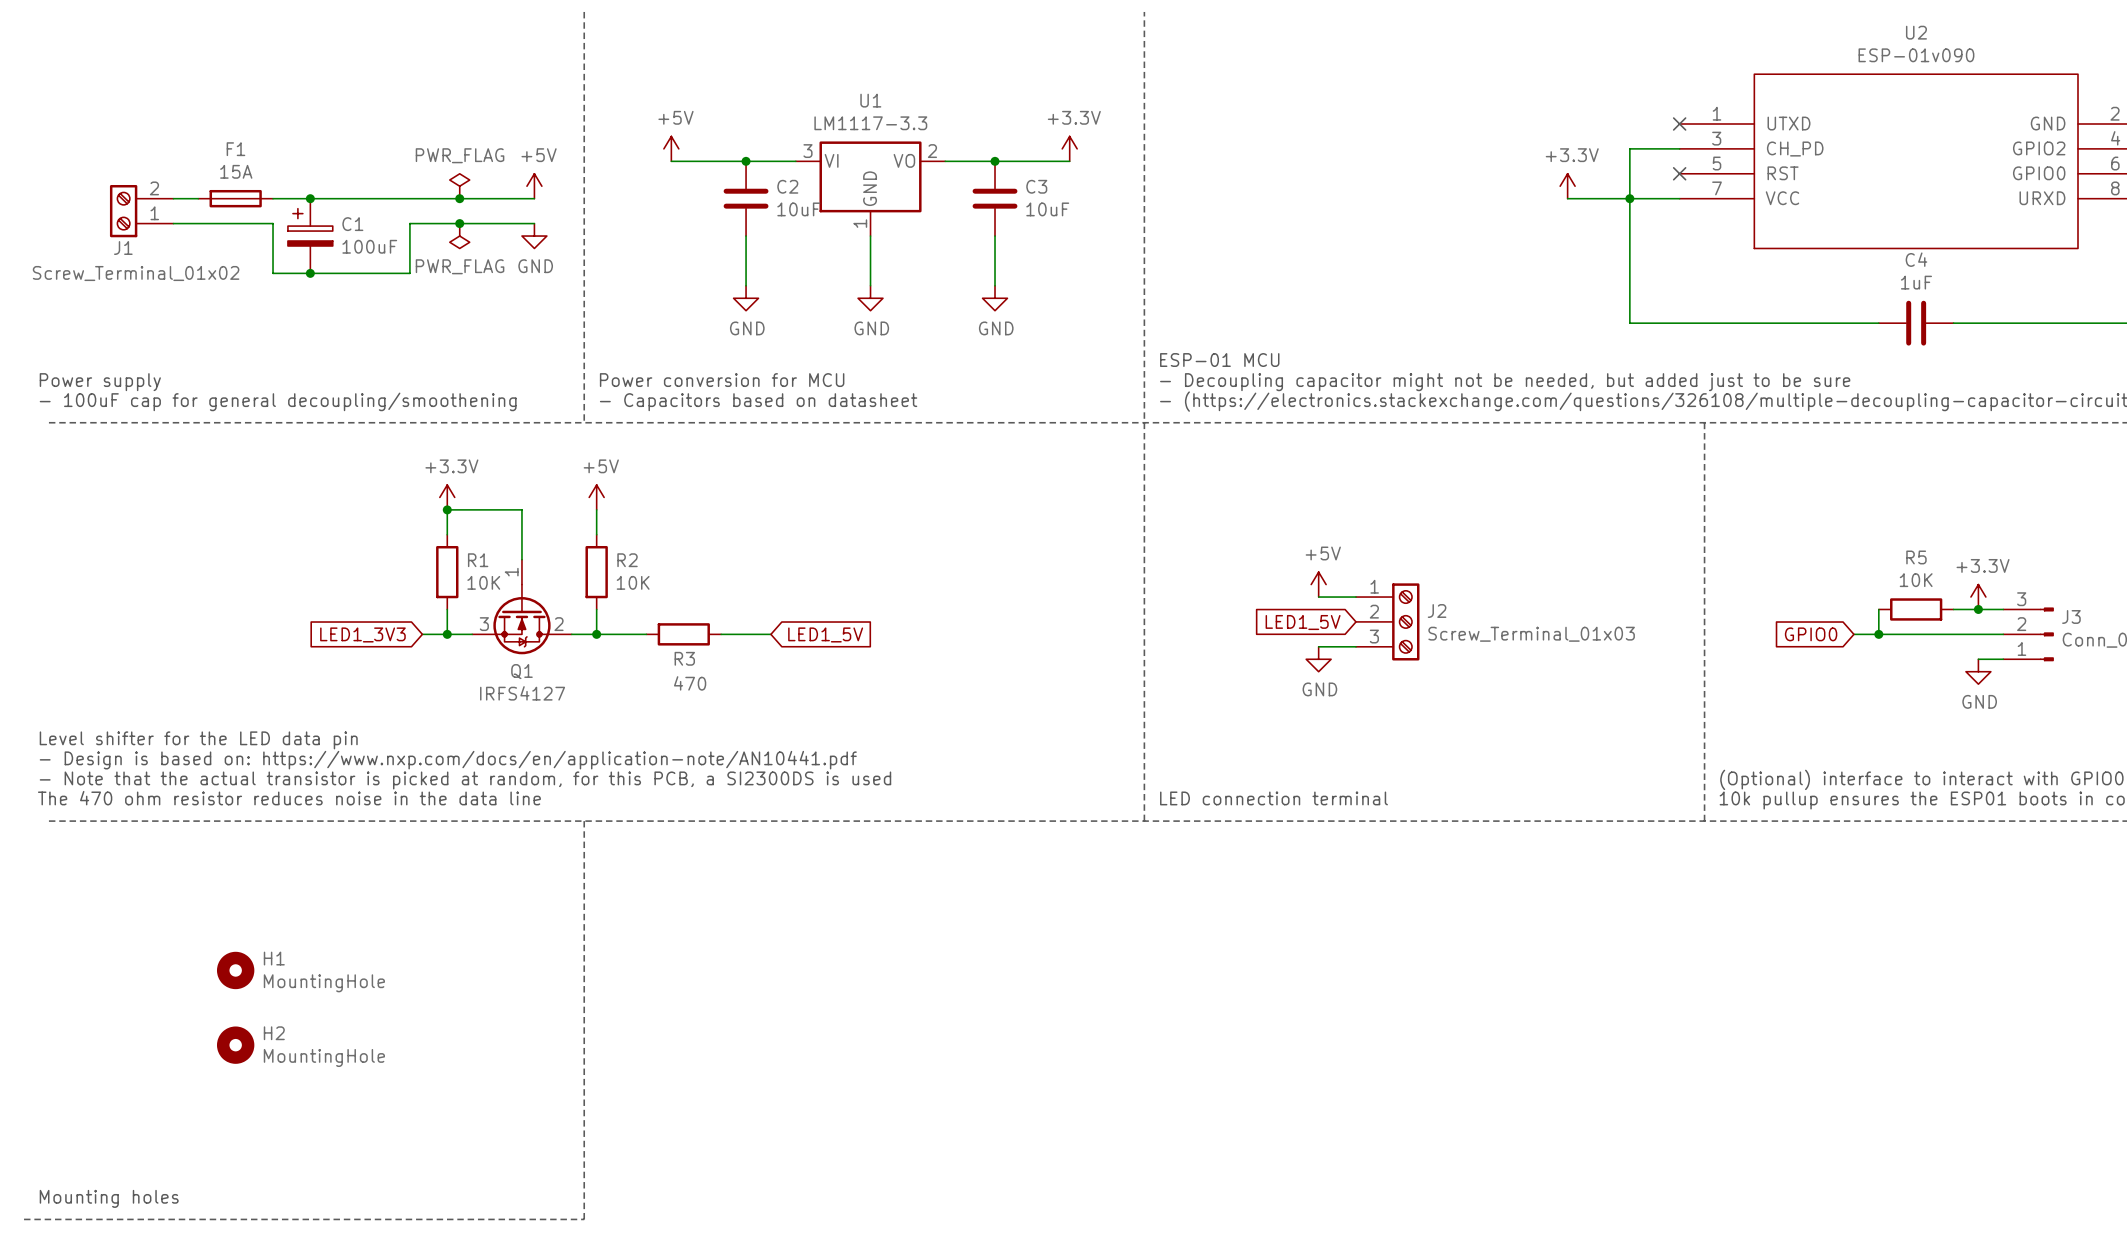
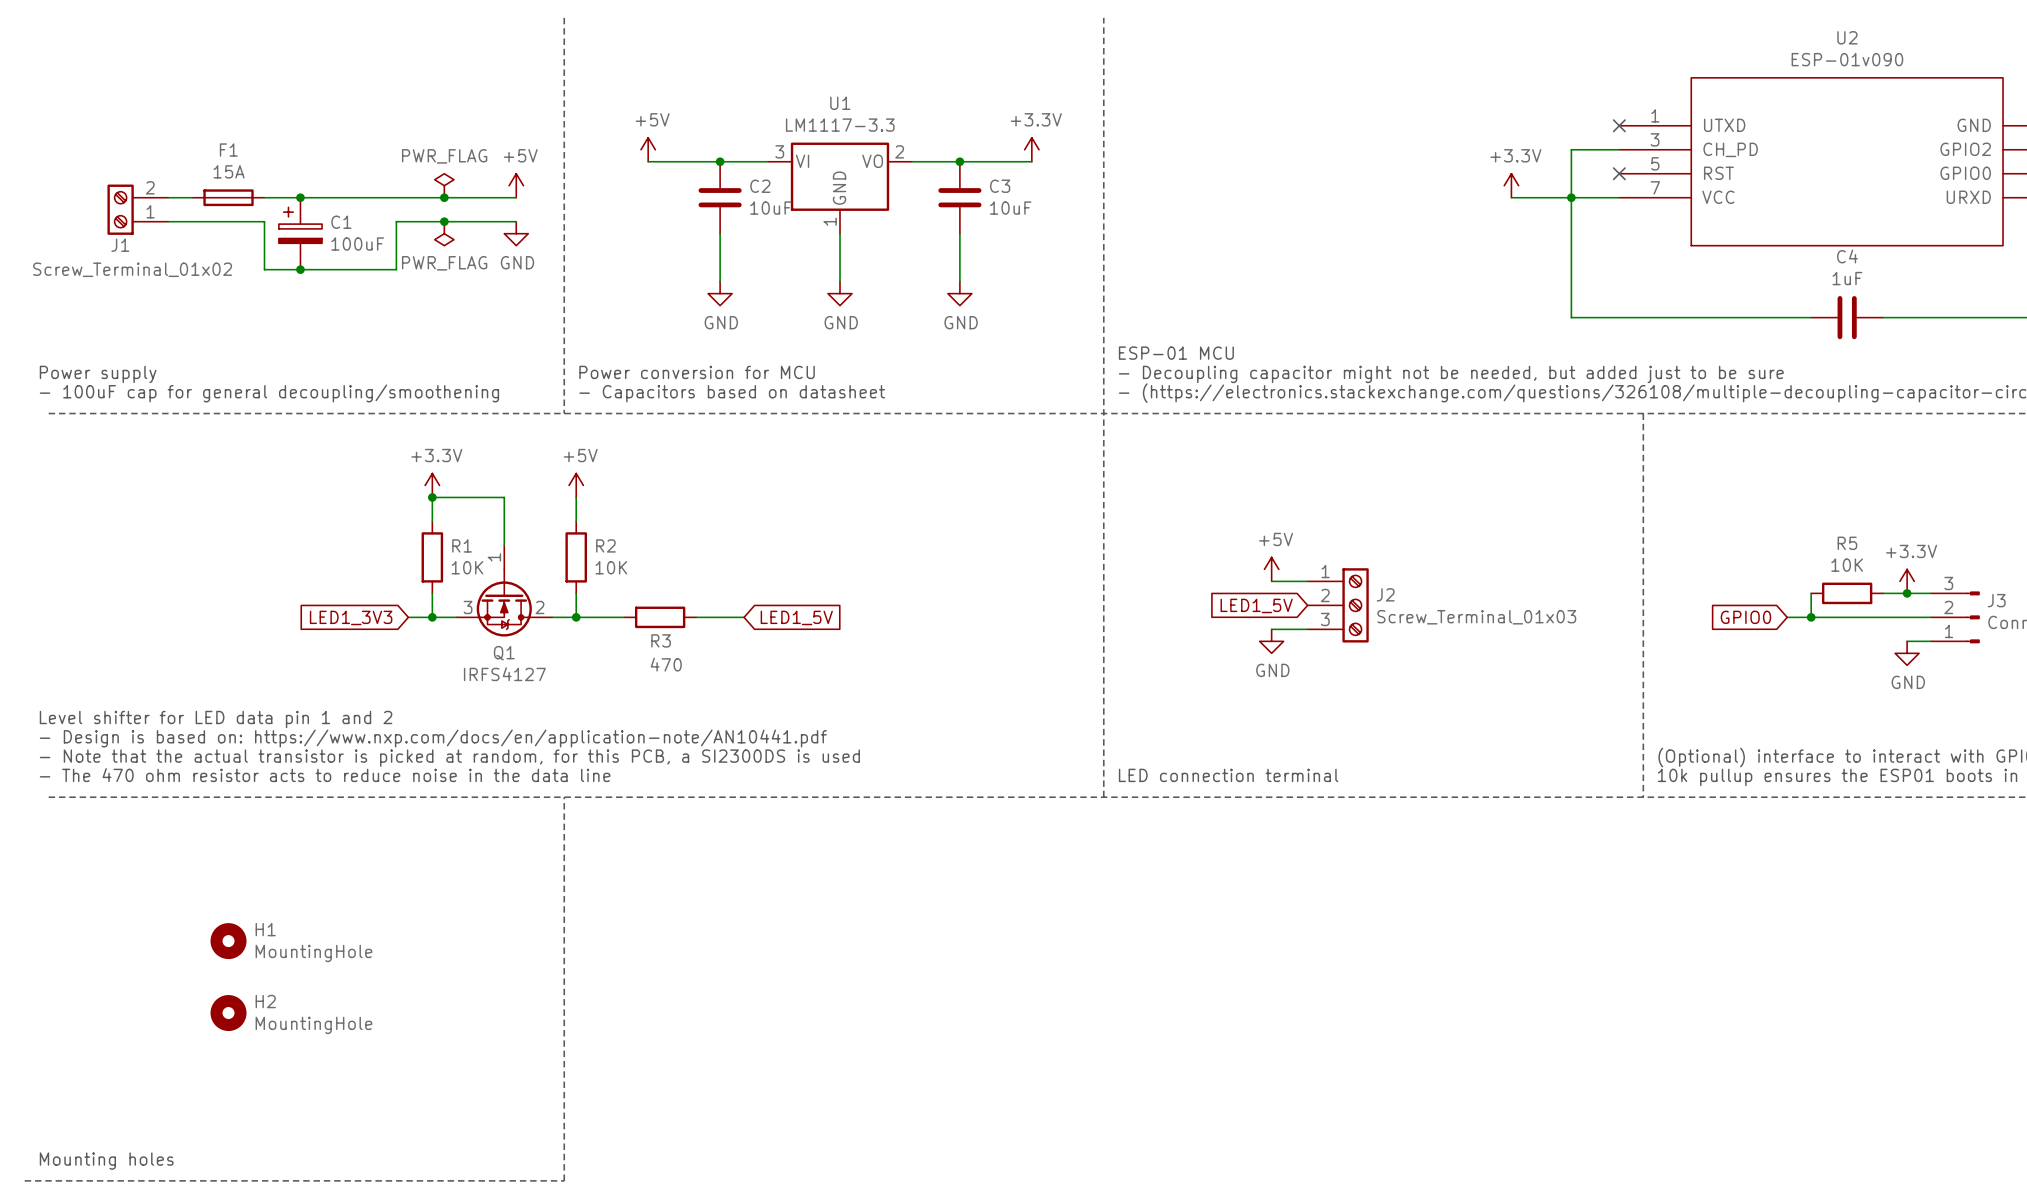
text: Level shifter for the LED data pin (198, 740) -> Level shifter for LED data pin 1 and 2 (216, 719)
text: The 470 ohm resistor reduces noise in the data line (289, 798) -> - The 470 ohm resistor acts to reduce noise in the data line (325, 775)

